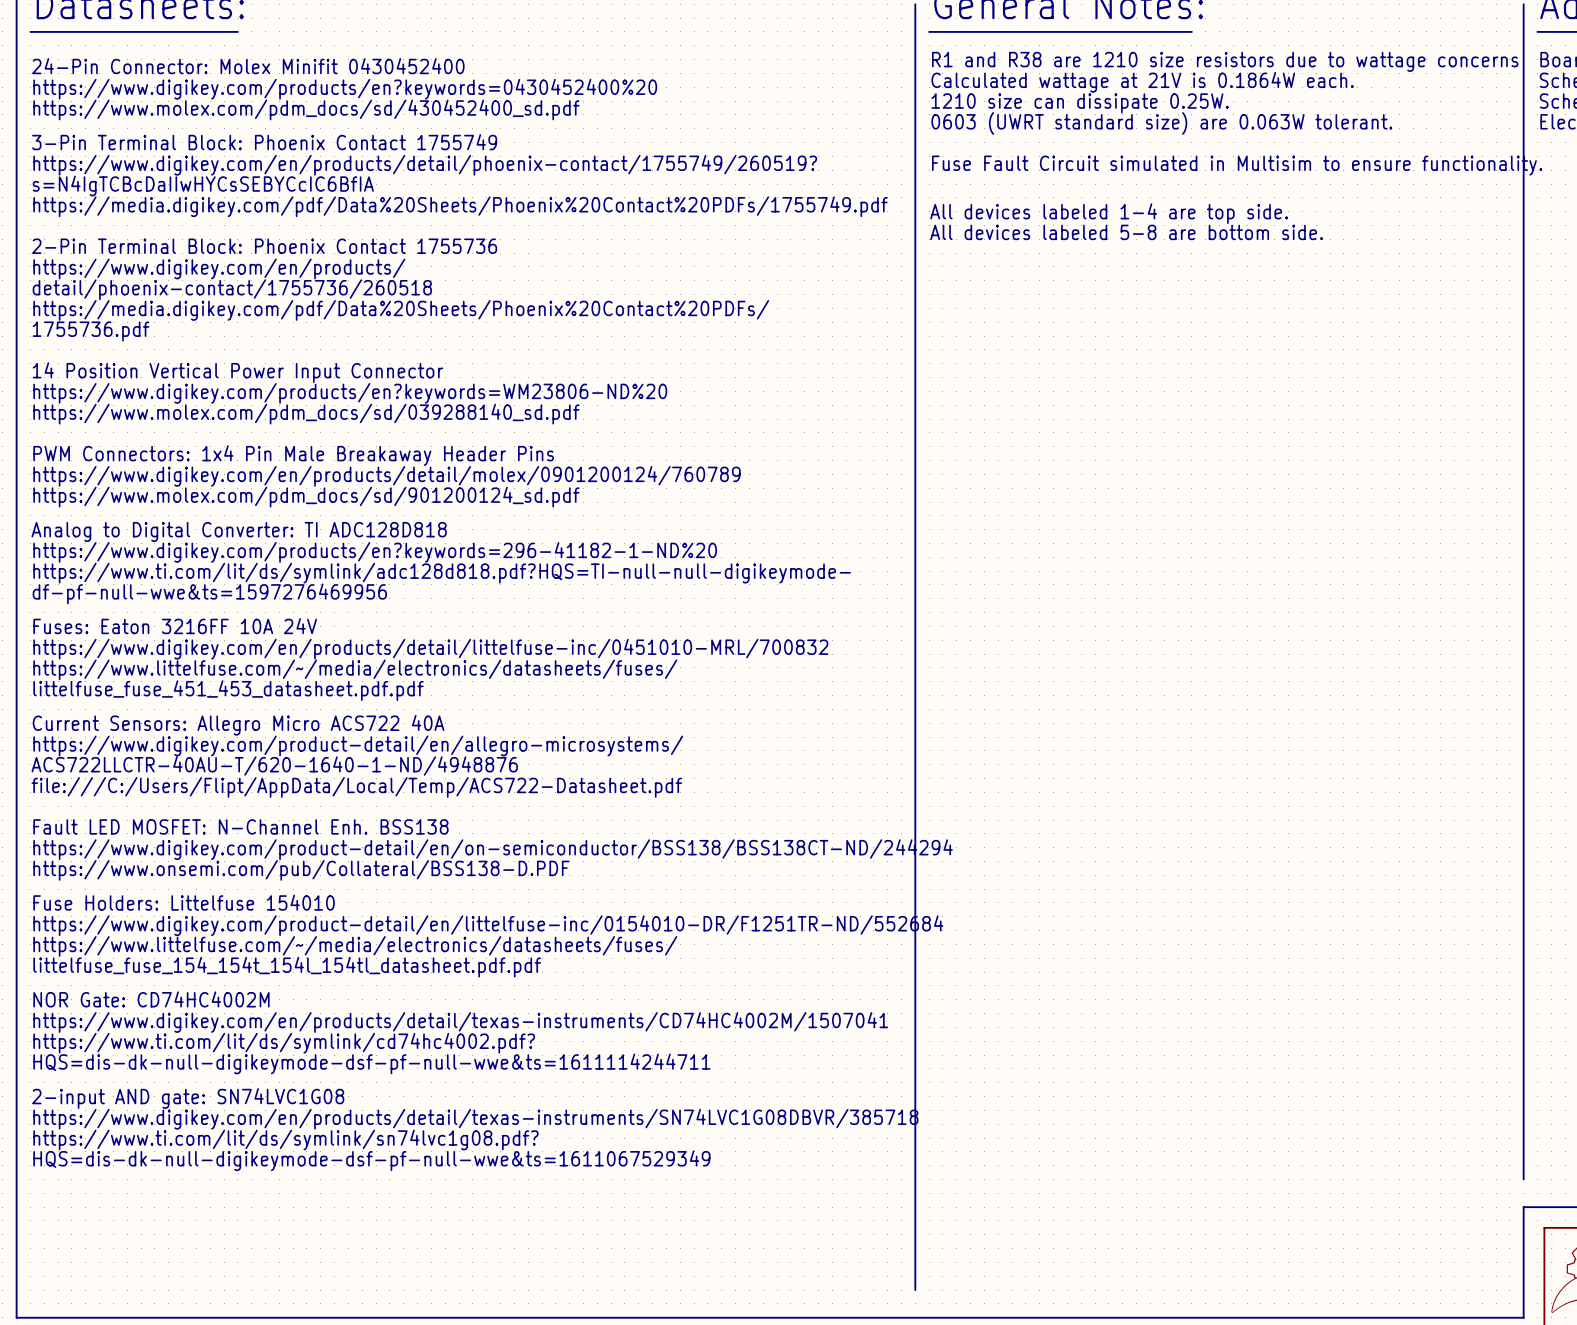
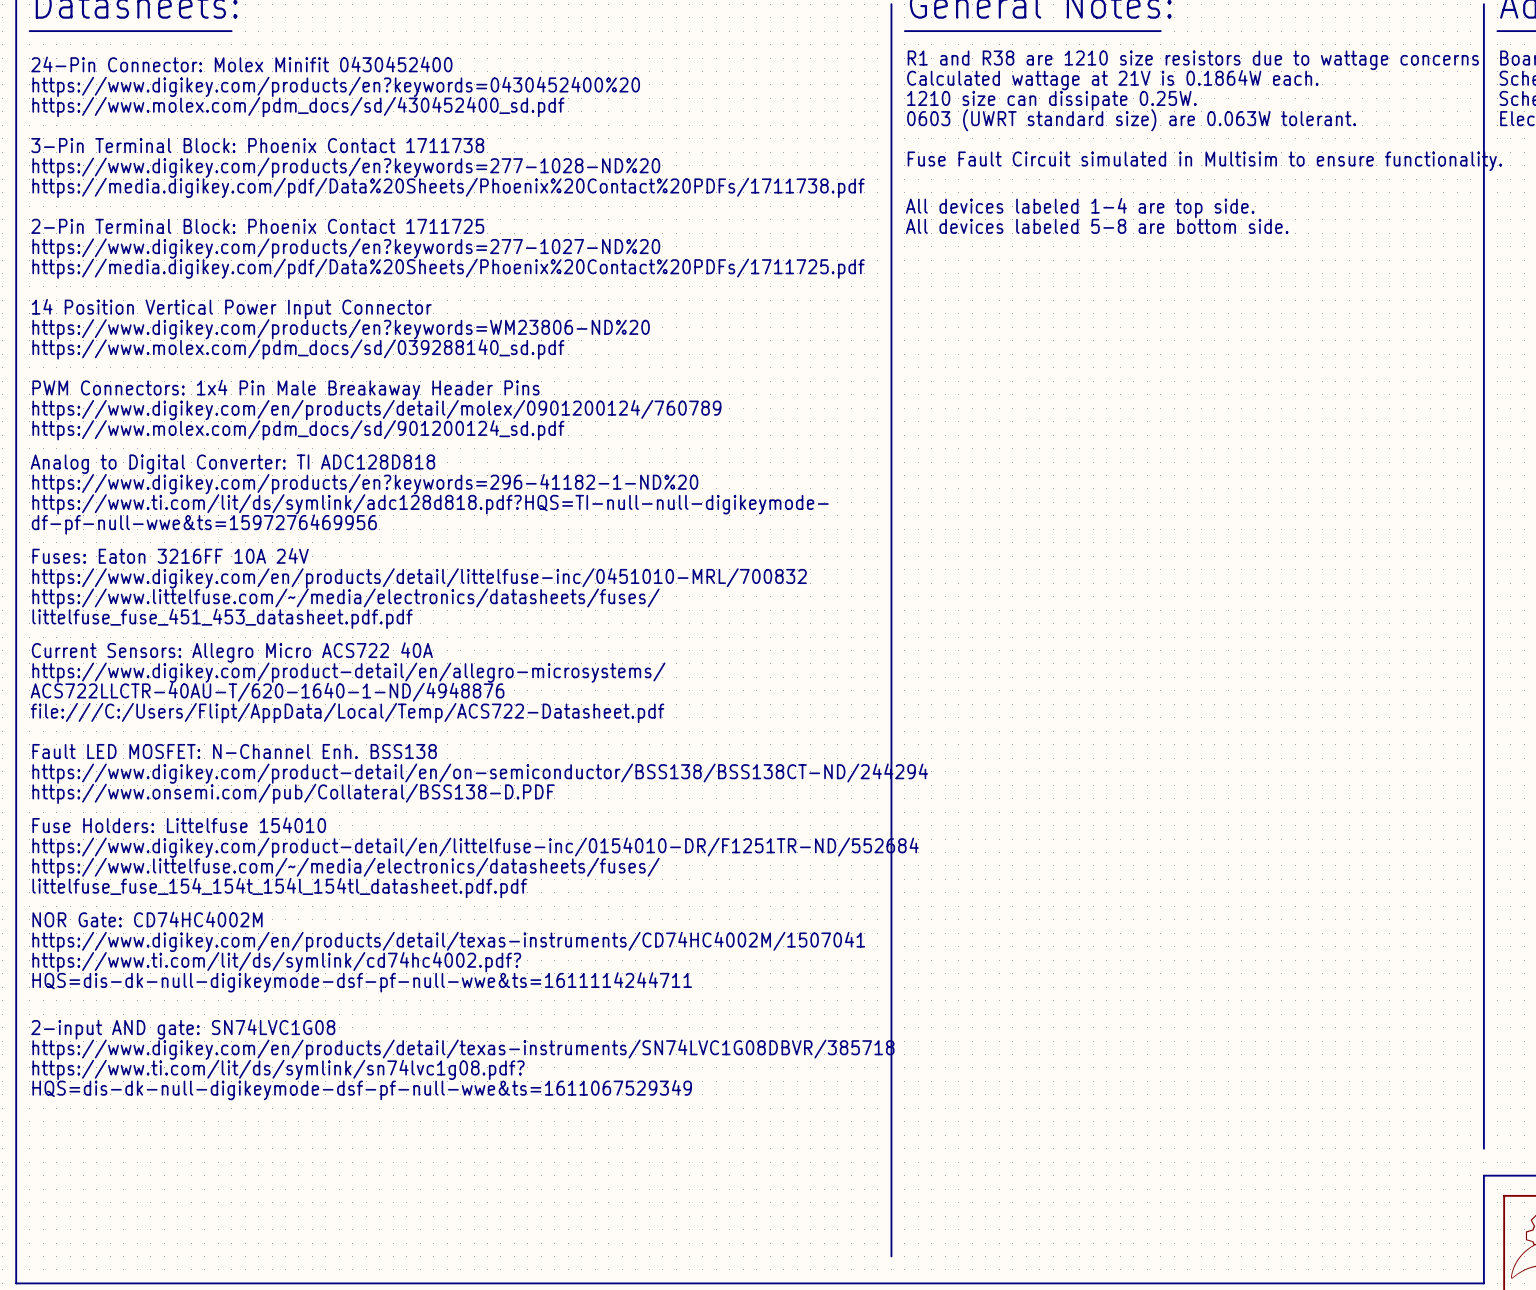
text: 3-Pin Terminal Block: Phoenix Contact 1755749 (264, 142) -> 3-Pin Terminal Block: Phoenix Contact 1711738 (257, 145)
text: https://www.digikey.com/en/products/detail/phoenix-contact/1755749/260519? (425, 165) -> none
text: none -> https://www.digikey.com/products/en?keywords=277-1028-ND%20 (346, 167)
text: s=N4IgTCBcDaIIwHYCsSEBYCcIC6BfIA (203, 185) -> none
text: https://media.digikey.com/pdf/Data%20Sheets/Phoenix%20Contact%20PDFs/1755749.pdf (460, 206) -> https://media.digikey.com/pdf/Data%20Sheets/Phoenix%20Contact%20PDFs/1711738.pdf (448, 187)
text: 2-Pin Terminal Block: Phoenix Contact 1755736 (264, 246) -> 2-Pin Terminal Block: Phoenix Contact 1711725 (257, 226)
text: https://www.digikey.com/en/products/ (219, 268) -> https://www.digikey.com/products/en?keywords=277-1027-ND%20 (346, 248)
text: none -> https://media.digikey.com/pdf/Data%20Sheets/Phoenix%20Contact%20PDFs/1711725.pdf (448, 268)
text: detail/phoenix-contact/1755736/260518 (232, 289) -> none
text: https://media.digikey.com/pdf/Data%20Sheets/Phoenix%20Contact%20PDFs/ (401, 310) -> none
text: 1755736.pdf (91, 331) -> none
text position: 14 Position Vertical Power Input Connector (237, 372) -> 14 Position Vertical Power Input Connector (231, 309)
text position: https://www.digikey.com/products/en?keywords=WM23806-ND%20 (350, 393) -> https://www.digikey.com/products/en?keywords=WM23806-ND%20 (341, 329)
text position: https://www.molex.com/pdm_docs/sd/039288140_sd.pdf (306, 414) -> https://www.molex.com/pdm_docs/sd/039288140_sd.pdf (298, 349)
text: none -> https://www.digikey.com/en/products/detail/molex/0901200124/760789 (376, 410)
text: none -> https://www.molex.com/pdm_docs/sd/901200124_sd.pdf (298, 430)
text position: PWM Connectors: 1x4 Pin Male Breakaway Header Pins (293, 455) -> PWM Connectors: 1x4 Pin Male Breakaway Header Pins (286, 389)
text: https://www.digikey.com/en/products/detail/molex/0901200124/760789 (387, 476) -> Analog to Digital Converter: TI ADC128D818 (232, 464)
text: https://www.molex.com/pdm_docs/sd/901200124_sd.pdf (306, 497) -> https://www.digikey.com/products/en?keywords=296-41182-1-ND%20 (365, 484)
text: none -> https://www.ti.com/lit/ds/symlink/adc128d818.pdf?HQS=TI-null-null-digikeymode- (430, 504)
text: Analog to Digital Converter: TI ADC128D818 (239, 531) -> none
text: none -> df-pf-null-wwe&ts=1597276469956 (204, 524)
text: https://www.digikey.com/products/en?keywords=296-41182-1-ND%20 (375, 552) -> none
text: https://www.ti.com/lit/ds/symlink/adc128d818.pdf?HQS=TI-null-null-digikeymode- (442, 573) -> Fuses: Eaton 3216FF 10A 24V (170, 555)
text: df-pf-null-wwe&ts=1597276469956 (209, 593) -> https://www.digikey.com/en/products/detail/littelfuse-inc/0451010-MRL/700832 (419, 578)
text: none -> https://www.littelfuse.com/~/media/electronics/datasheets/fuses/ (346, 598)
text: Fuses: Eaton 3216FF 10A 24V (175, 626) -> none
text: none -> littelfuse_fuse_451_453_datasheet.pdf.pdf (222, 618)
text: https://www.digikey.com/en/products/detail/littelfuse-inc/0451010-MRL/700832 (430, 649) -> none
text: https://www.littelfuse.com/~/media/electronics/datasheets/fuses/ (355, 669) -> Current Sensors: Allegro Micro ACS722 40A (232, 652)
text: littelfuse_fuse_451_453_datasheet.pdf.pdf (228, 690) -> https://www.digikey.com/product-detail/en/allegro-microsystems/ (348, 672)
text: Current Sensors: Allegro Micro ACS722 40A (238, 725) -> none
text: https://www.digikey.com/product-detail/en/allegro-microsystems/ (358, 745) -> none
text position: ACS722LLCTR-40AU-T/620-1640-1-ND/4948876 (274, 766) -> ACS722LLCTR-40AU-T/620-1640-1-ND/4948876 (267, 692)
text position: file:///C:/Users/Flipt/AppData/Local/Temp/ACS722-Datasheet.pdf (356, 787) -> file:///C:/Users/Flipt/AppData/Local/Temp/ACS722-Datasheet.pdf (347, 713)
text: none -> https://www.digikey.com/product-detail/en/on-semiconductor/BSS138/BSS138CT-ND/244294 (480, 773)
text: none -> https://www.onsemi.com/pub/Collateral/BSS138-D.PDF (293, 793)
text position: Fault LED MOSFET: N-Channel Enh. BSS138 (240, 826) -> Fault LED MOSFET: N-Channel Enh. BSS138 (234, 751)
text: https://www.digikey.com/product-detail/en/on-semiconductor/BSS138/BSS138CT-ND/244294 (493, 849) -> Fuse Holders: Littelfuse 154010 (179, 825)
text: https://www.onsemi.com/pub/Collateral/BSS138-D.PDF (301, 870) -> https://www.digikey.com/product-detail/en/littelfuse-inc/0154010-DR/F1251TR-ND/552684 (475, 847)
text: none -> https://www.littelfuse.com/~/media/electronics/datasheets/fuses/ (346, 867)
text: Fuse Holders: Littelfuse 154010 (184, 902) -> none
text: none -> littelfuse_fuse_154_154t_154l_154tl_datasheet.pdf.pdf (279, 888)
text: https://www.digikey.com/product-detail/en/littelfuse-inc/0154010-DR/F1251TR-ND/552684 (488, 925) -> none
text: https://www.littelfuse.com/~/media/electronics/datasheets/fuses/ (355, 946) -> NOR Gate: CD74HC4002M (147, 919)
text: littelfuse_fuse_154_154t_154l_154tl_datasheet.pdf.pdf (287, 967) -> https://www.digikey.com/en/products/detail/texas-instruments/CD74HC4002M/1507041 (448, 941)
text: NOR Gate: CD74HC4002M (151, 999) -> none
text: https://www.digikey.com/en/products/detail/texas-instruments/CD74HC4002M/1507041 (460, 1022) -> none
text position: https://www.ti.com/lit/ds/symlink/cd74hc4002.pdf? (284, 1043) -> https://www.ti.com/lit/ds/symlink/cd74hc4002.pdf? (276, 962)
text: none -> 2-input AND gate: SN74LVC1G08 (183, 1029)
text position: HQS=dis-dk-null-digikeymode-dsf-pf-null-wwe&ts=1611114244711 (371, 1063) -> HQS=dis-dk-null-digikeymode-dsf-pf-null-wwe&ts=1611114244711 (362, 982)
text: none -> https://www.digikey.com/en/products/detail/texas-instruments/SN74LVC1G08DBVR/385718 (463, 1049)
text: 2-input AND gate: SN74LVC1G08 (188, 1098) -> https://www.ti.com/lit/ds/symlink/sn74lvc1g08.pdf? (278, 1069)
text: https://www.digikey.com/en/products/detail/texas-instruments/SN74LVC1G08DBVR/385718 (475, 1119) -> HQS=dis-dk-null-digikeymode-dsf-pf-null-wwe&ts=1611067529349 (362, 1090)
text: https://www.ti.com/lit/ds/symlink/sn74lvc1g08.pdf? (285, 1139) -> none
text: HQS=dis-dk-null-digikeymode-dsf-pf-null-wwe&ts=1611067529349 (371, 1160) -> none

